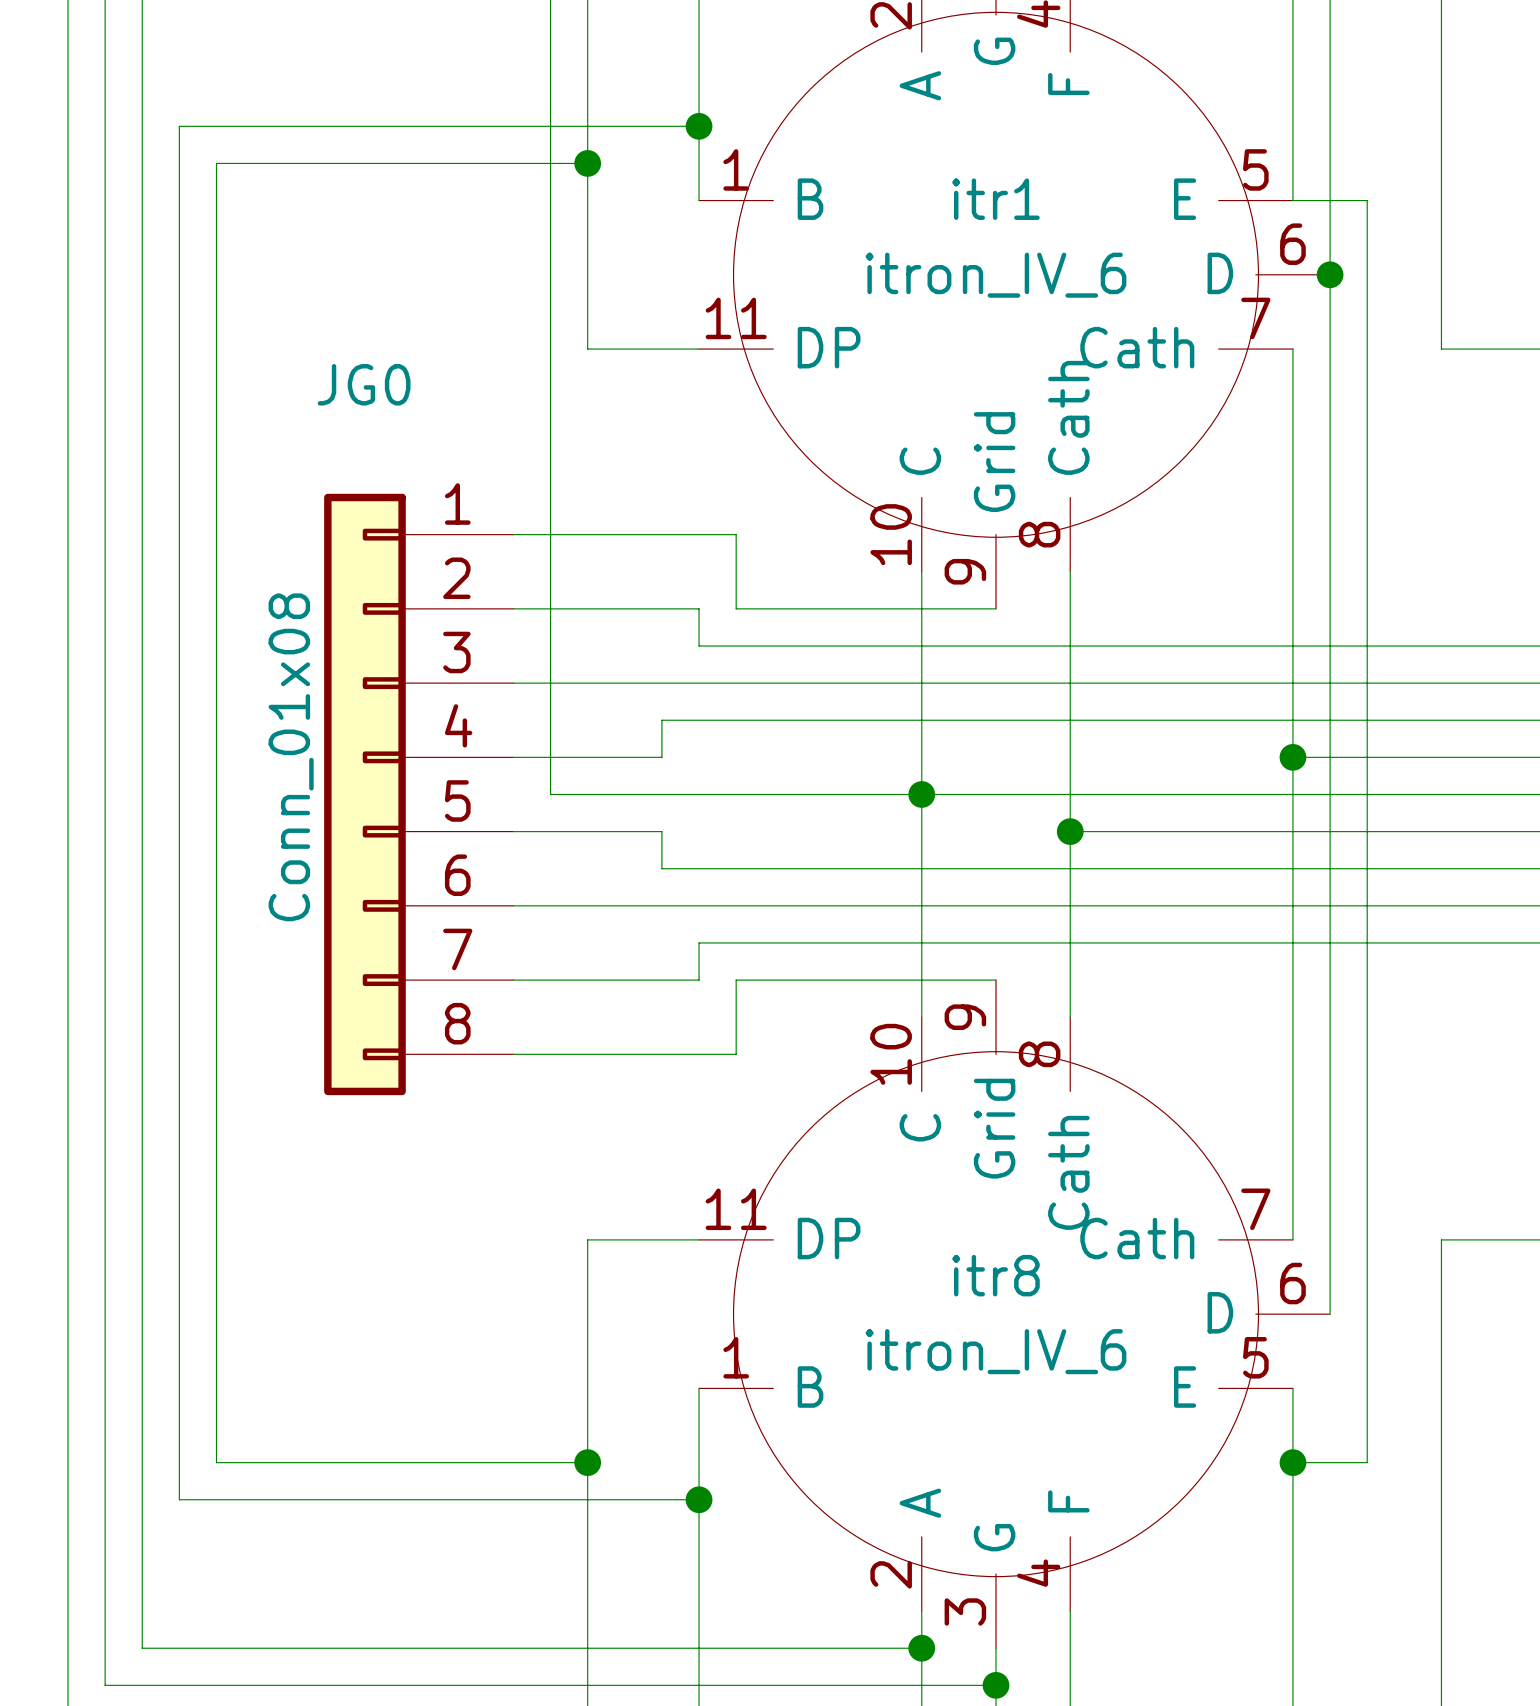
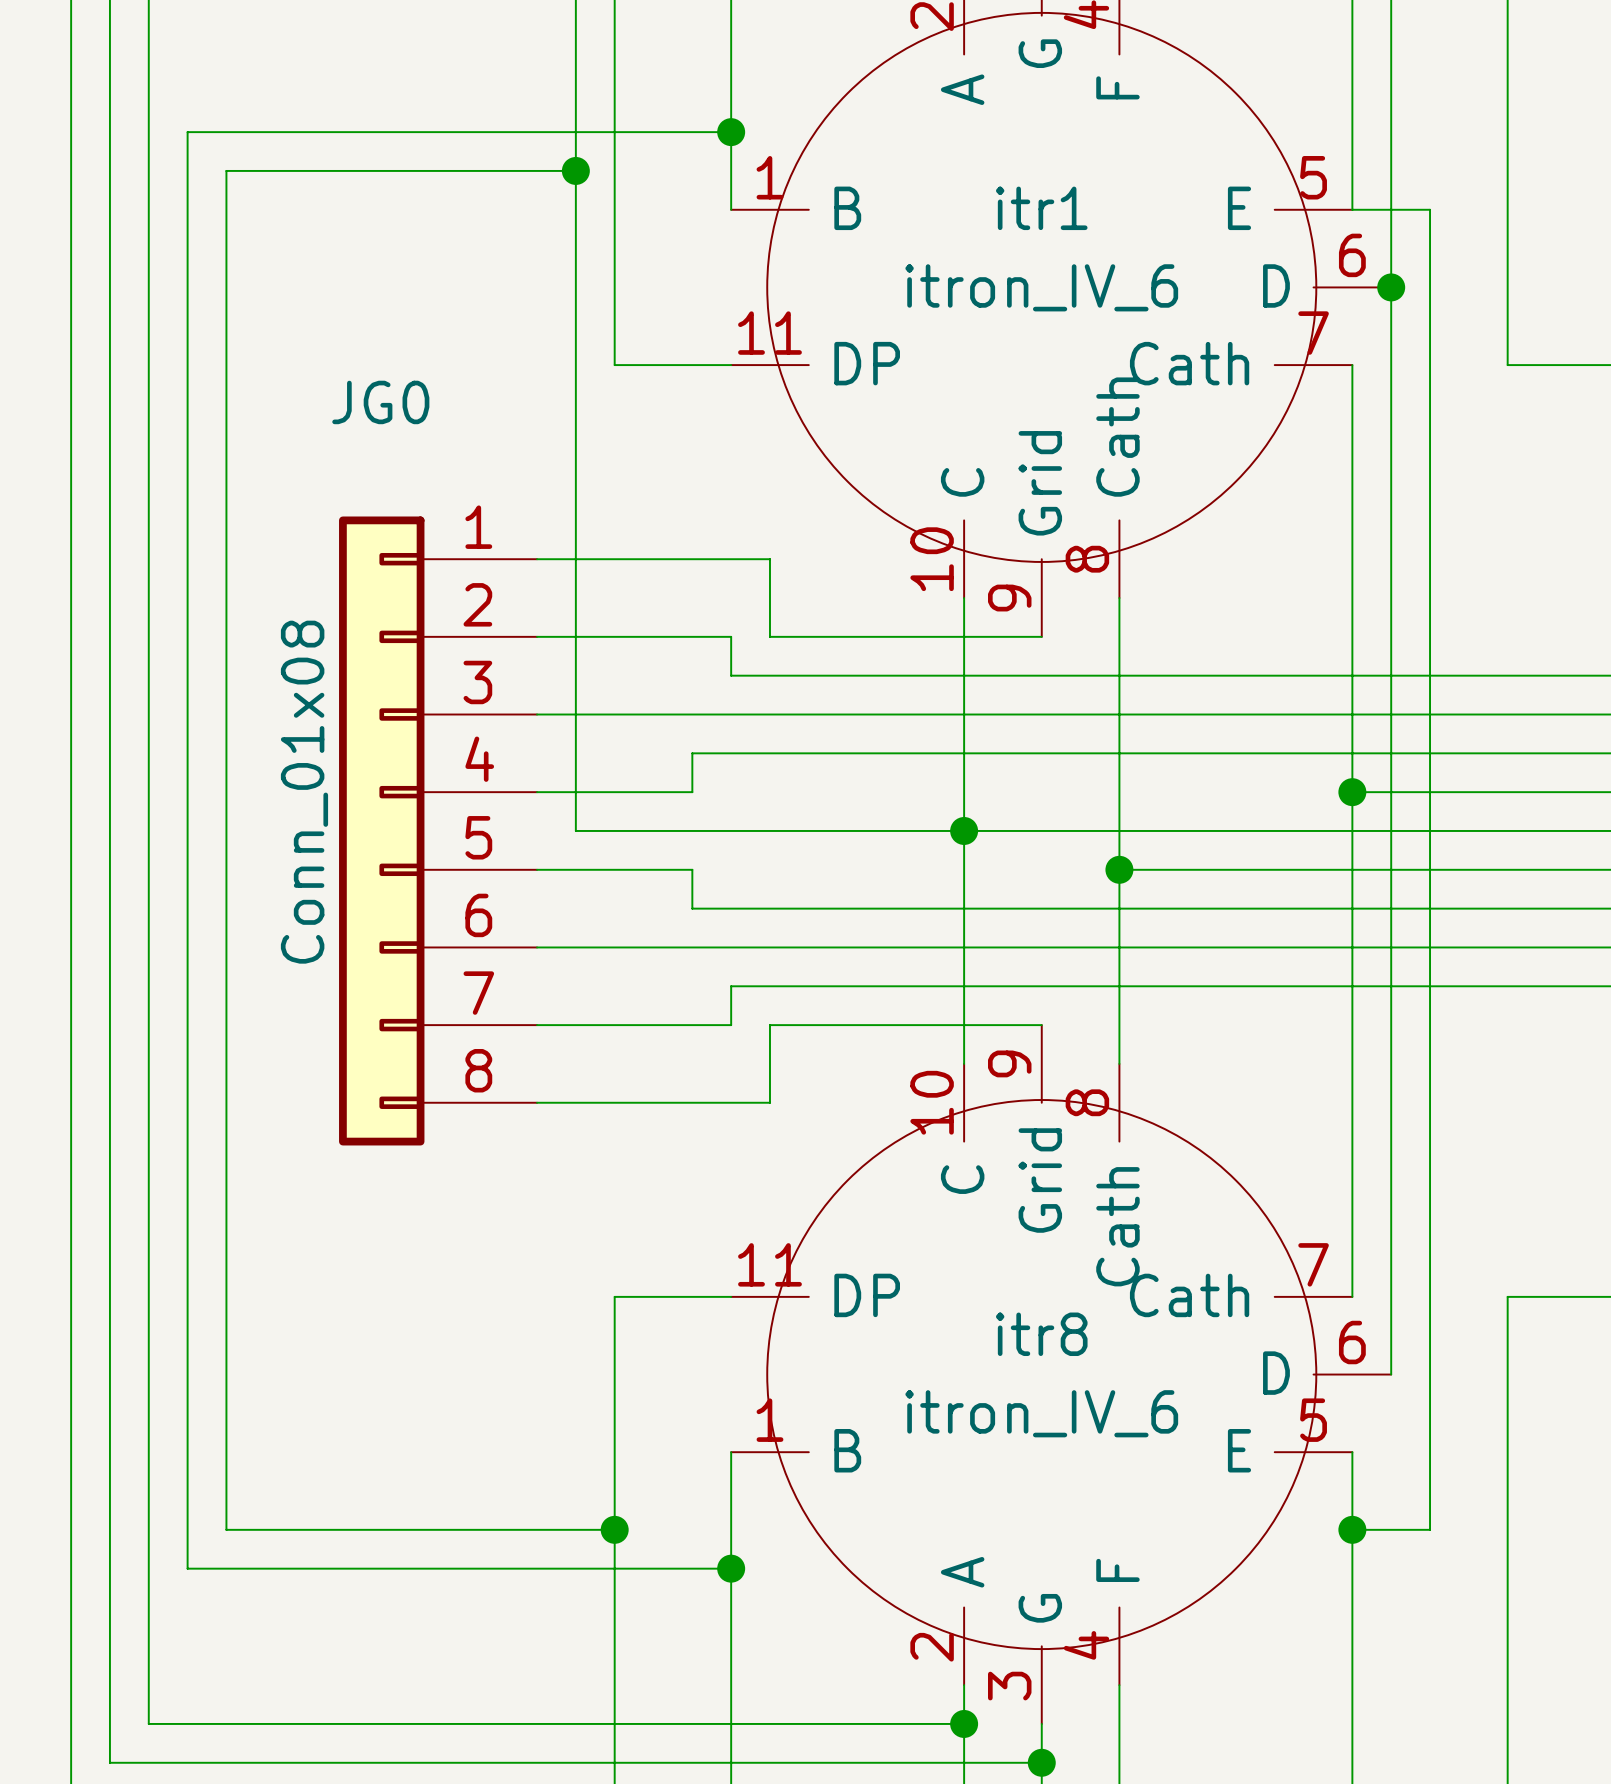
wire: (550, 163) (587, 163) -> none
junction position: (587, 163) -> (575, 170)

